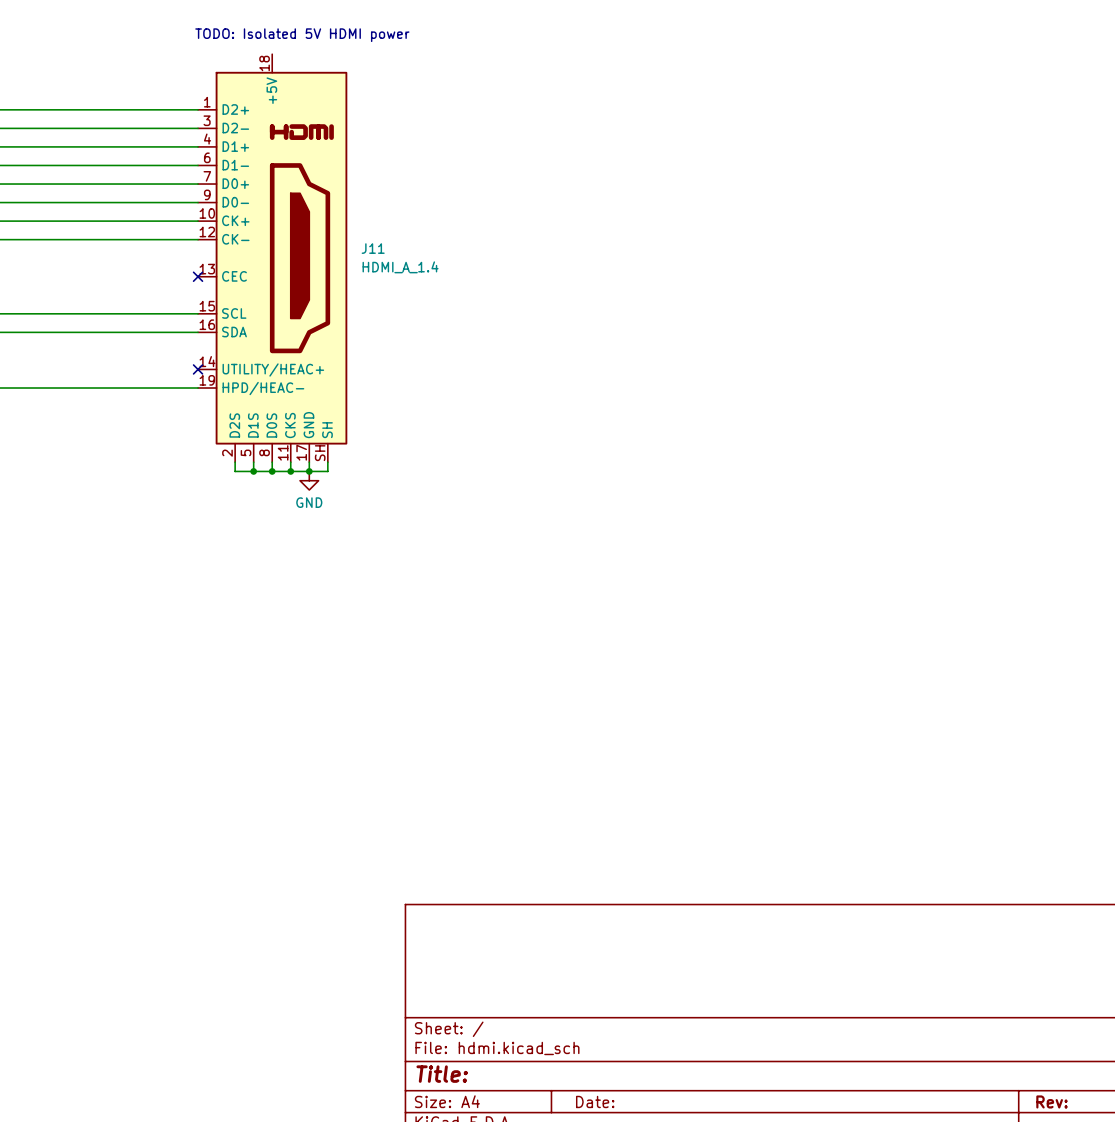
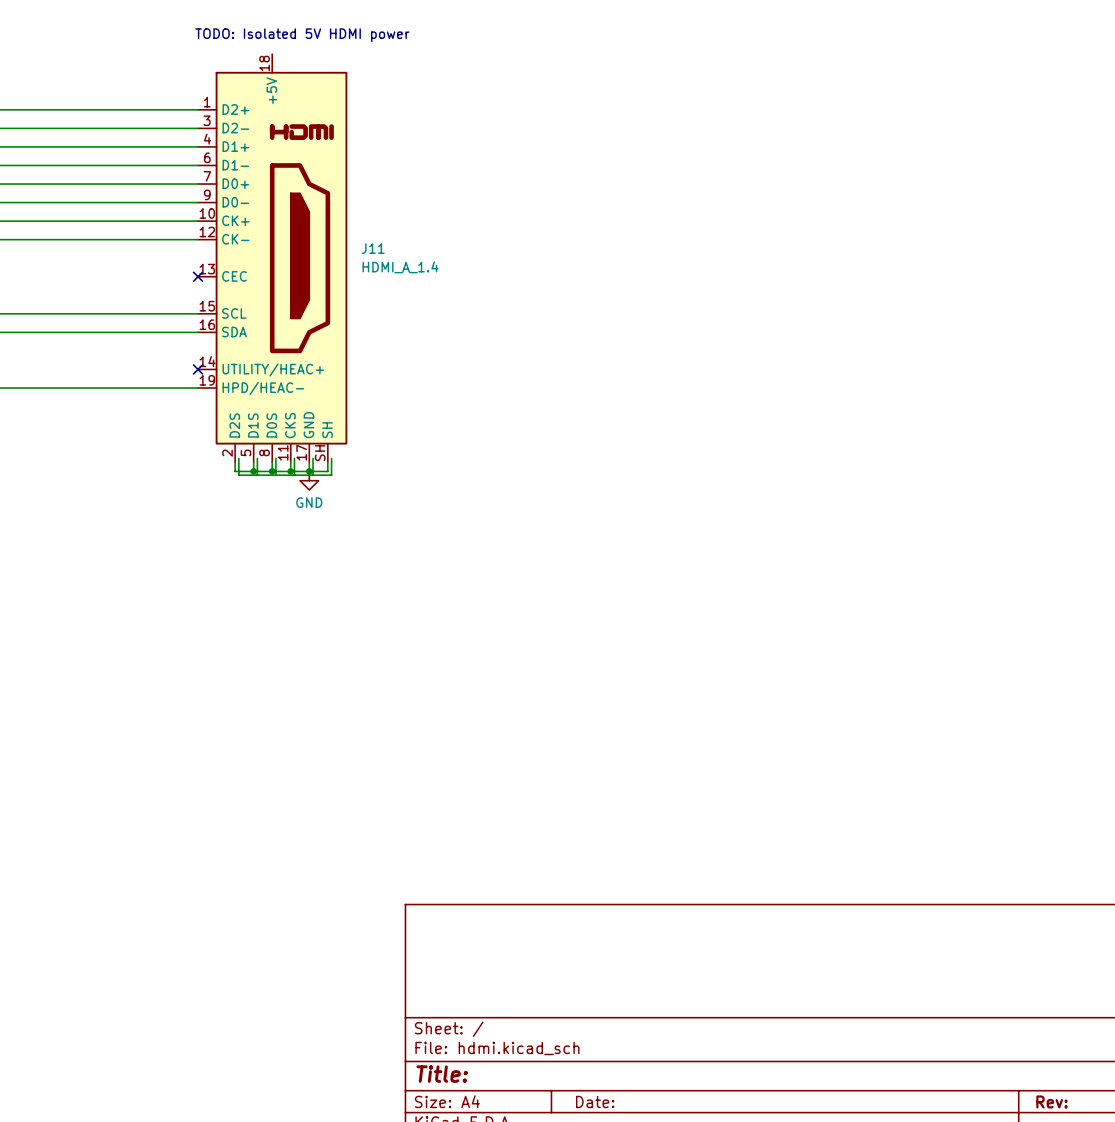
wire: none -> (238, 458) (238, 475) (331, 475) (331, 458)
wire: none -> (257, 458) (257, 475)
wire: none -> (275, 458) (275, 475)
wire: none -> (294, 458) (294, 475)
wire: none -> (313, 458) (313, 475)

